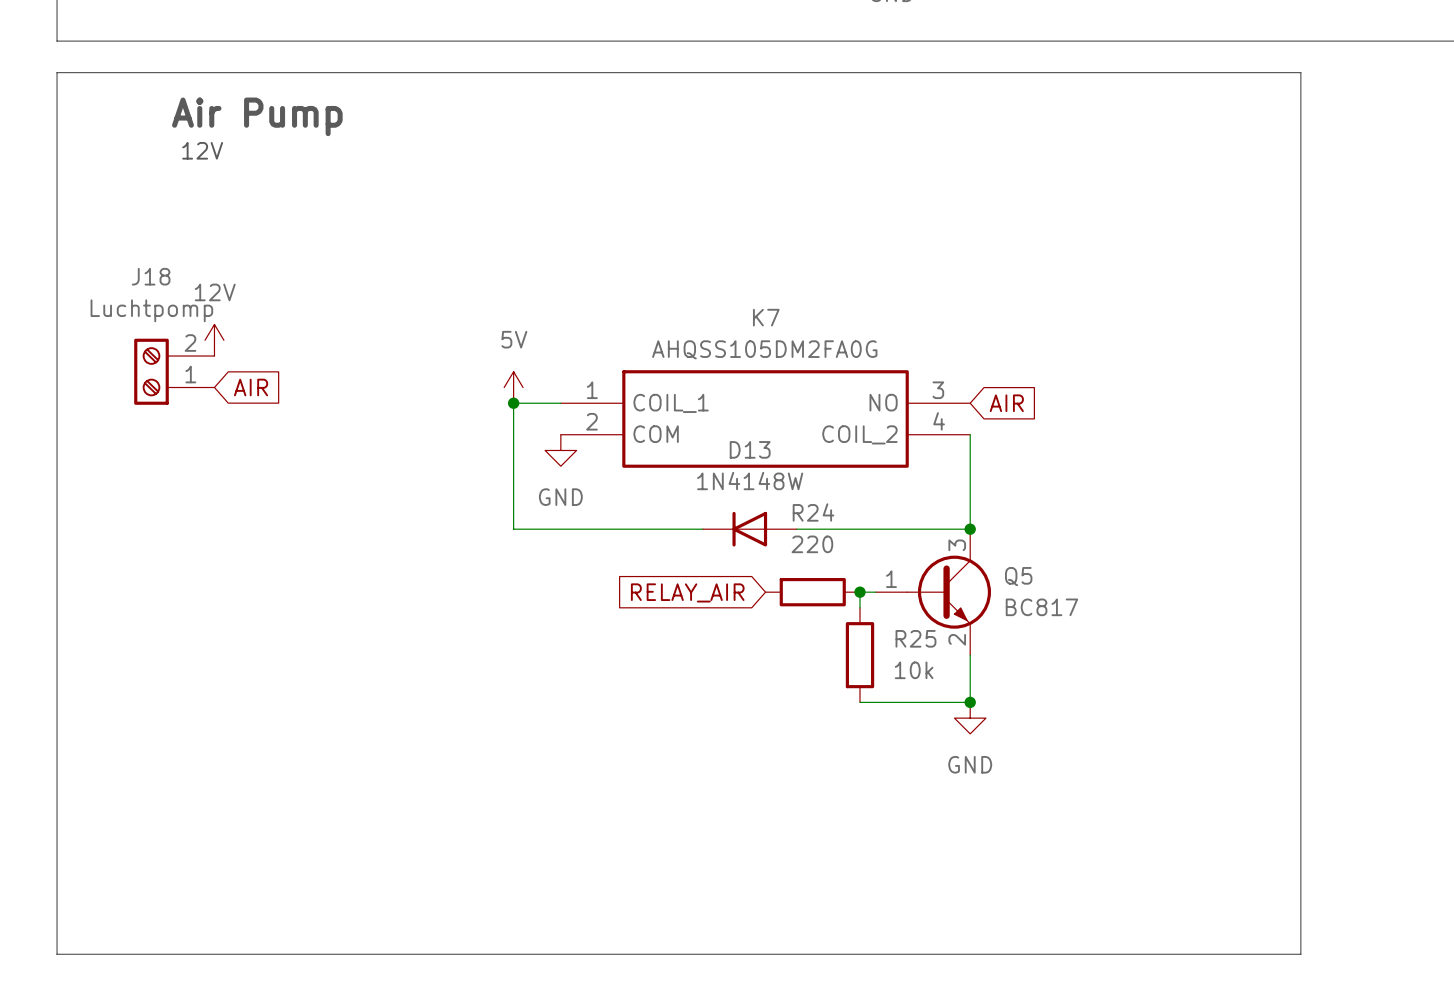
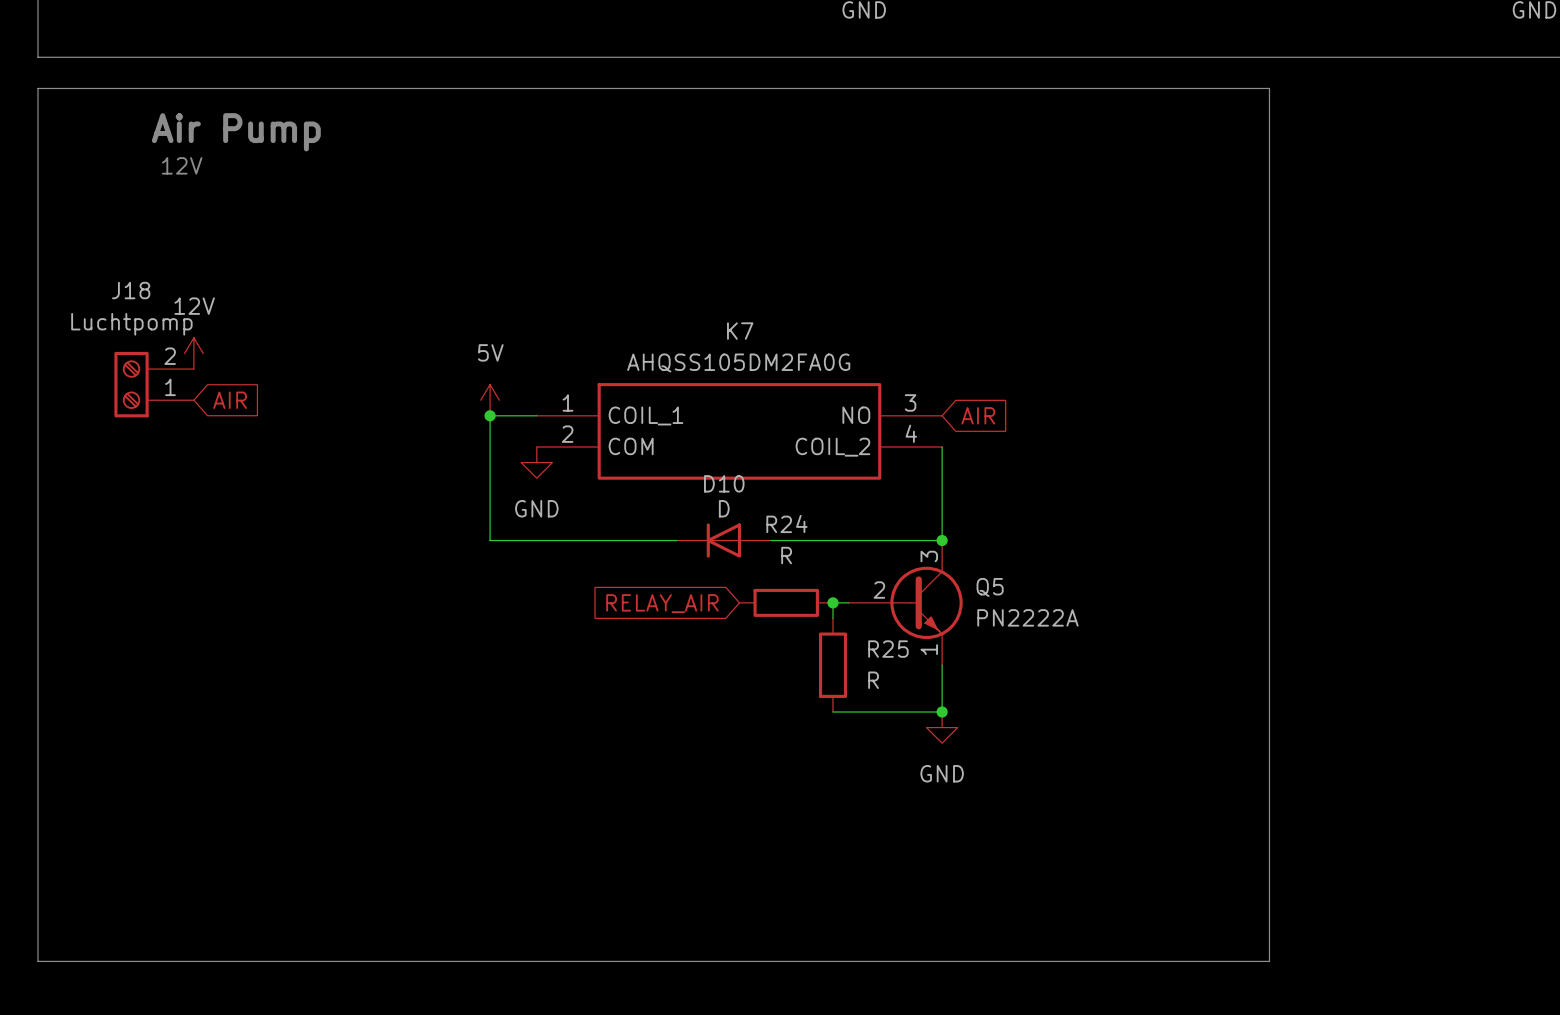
D13 name: D13 (750, 449) -> D10 (724, 483)
D13 value: 1N4148W (750, 481) -> D (724, 508)
Q5 symbol: [875, 529, 991, 656] -> [848, 540, 963, 666]
R24 value: 220 (812, 544) -> R (786, 555)
Q5 value: BC817 (1041, 607) -> PN2222A (1027, 617)
R25 value: 10k (914, 670) -> R (873, 680)

